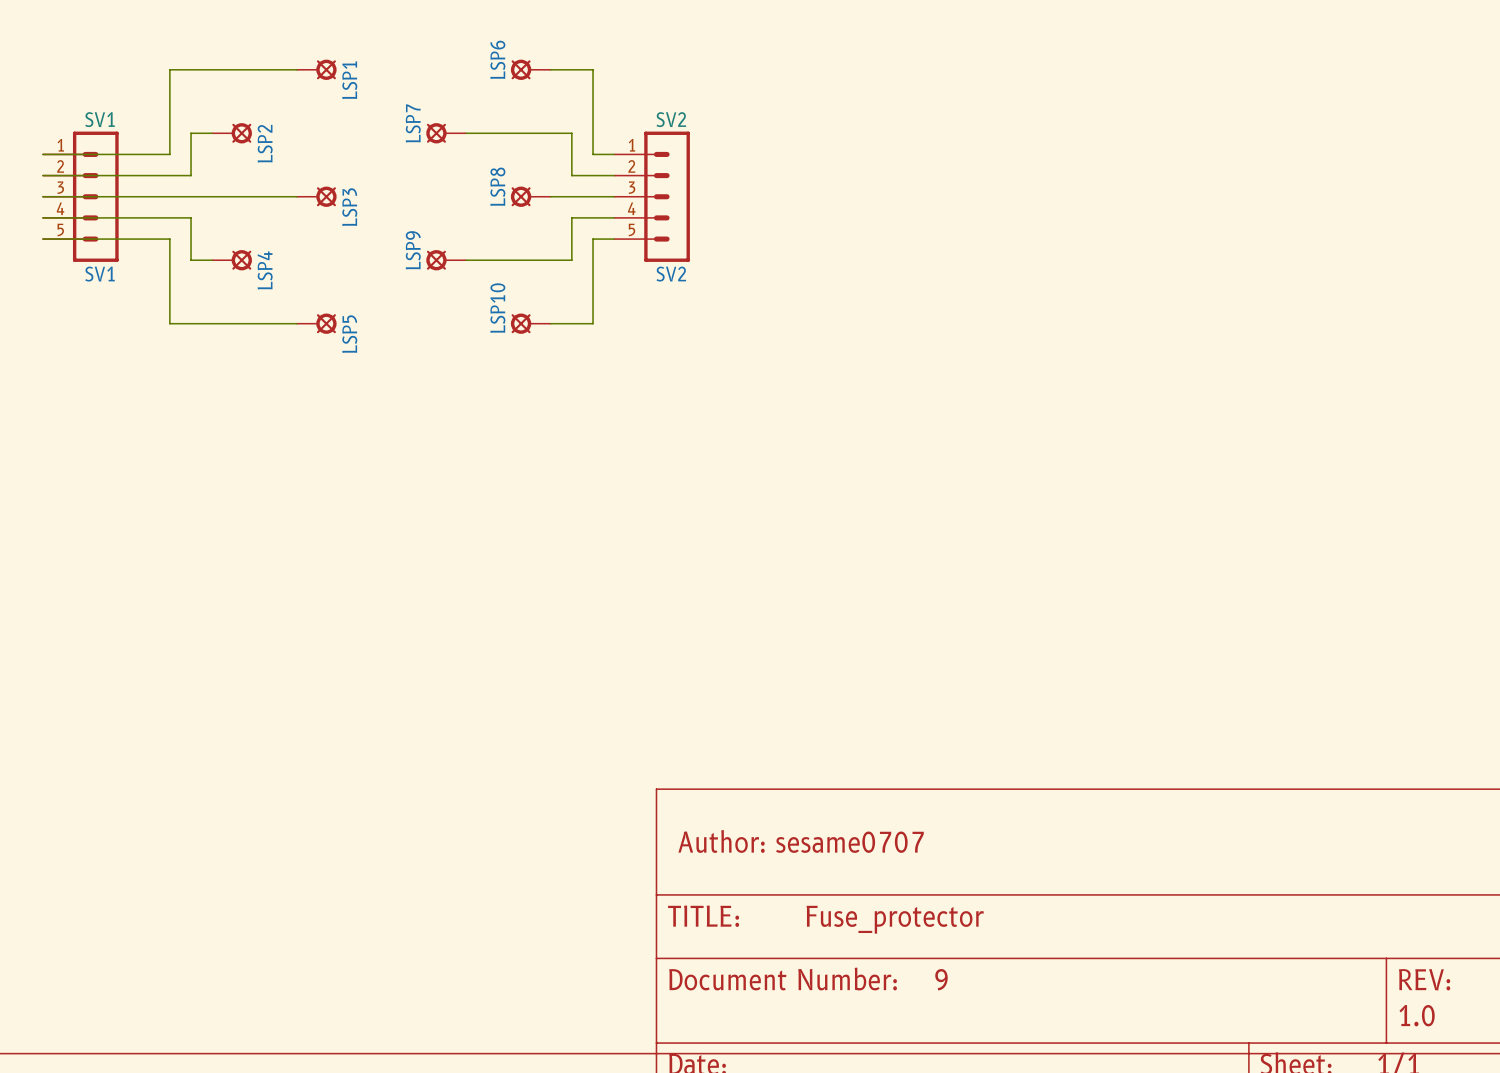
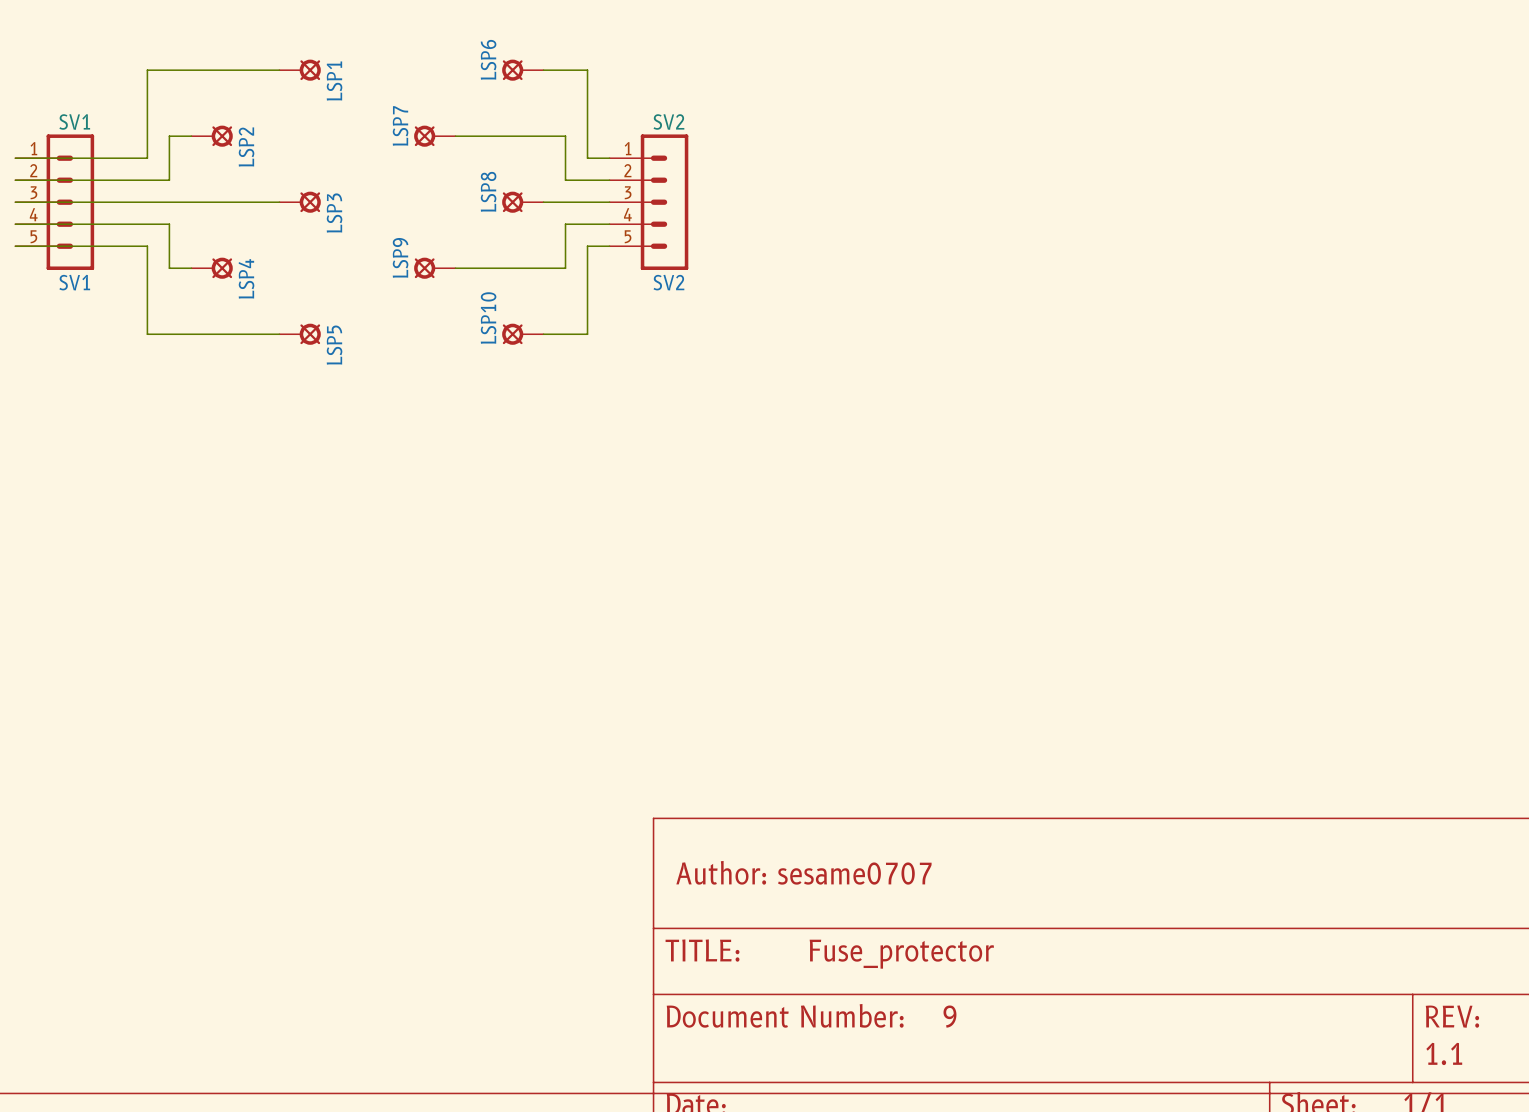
text: 1.0 (1417, 1015) -> 1.1 (1444, 1053)

